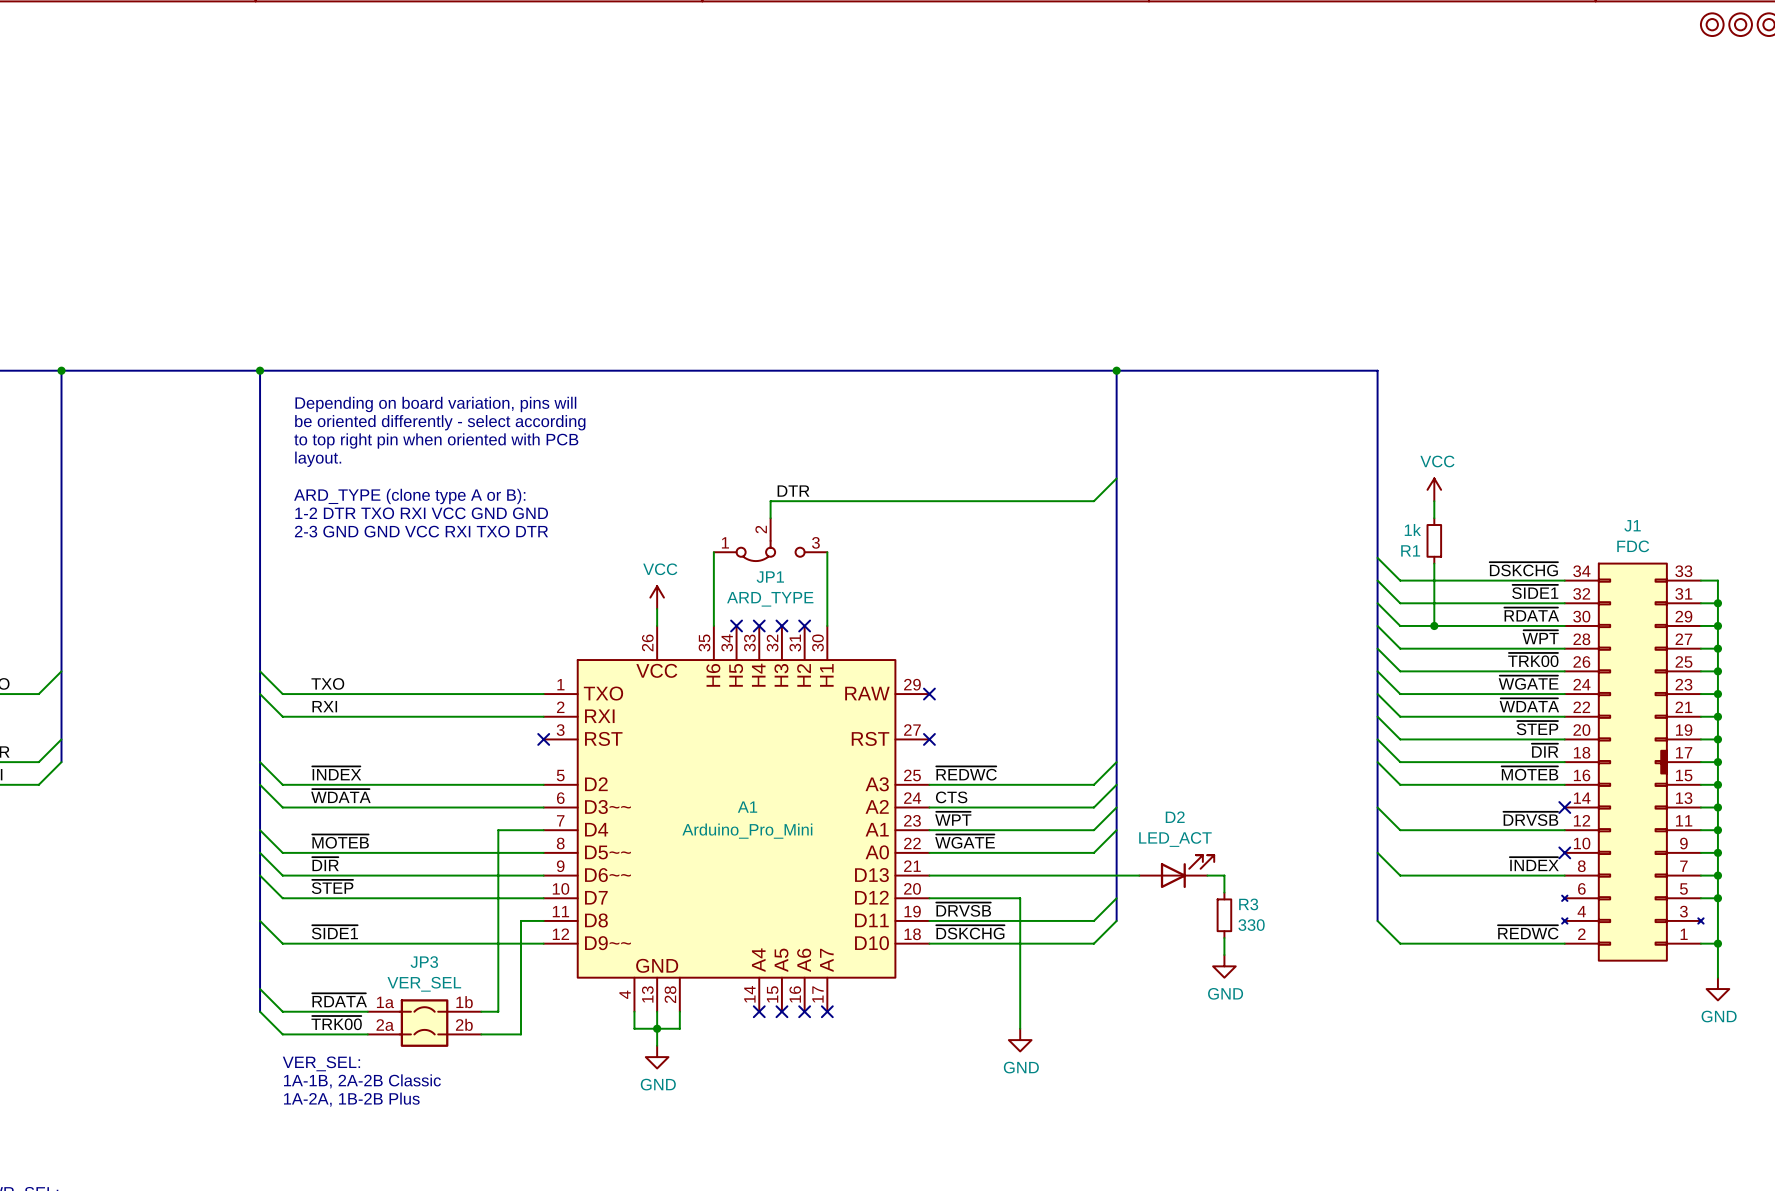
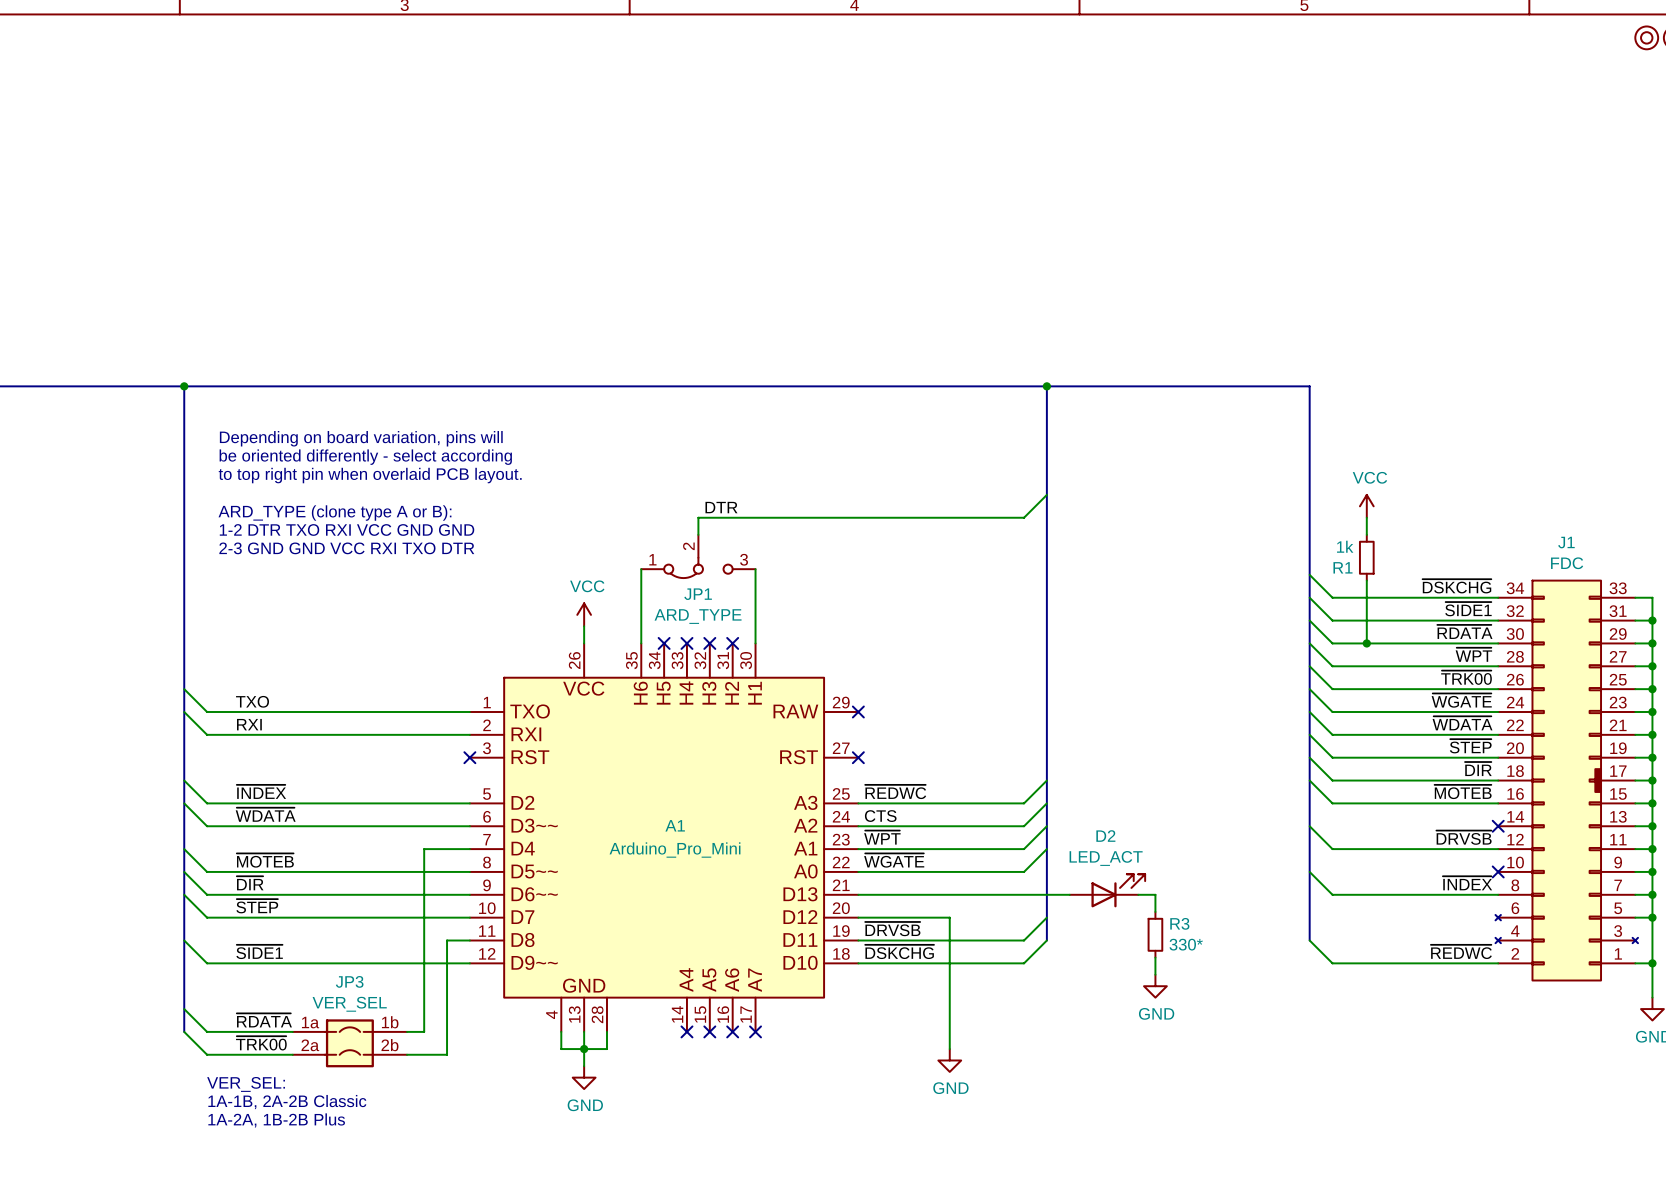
text: Depending on board variation, pins will (435, 404) -> none
text: be oriented differently - select according (440, 422) -> Depending on board variation, pins will (361, 438)
text: to top right pin when oriented with PCB (436, 440) -> be oriented differently - select according (365, 457)
text: layout. (318, 459) -> to top right pin when overlaid PCB layout. (370, 475)
R3 value: 330 (1251, 925) -> 330* (1186, 944)

